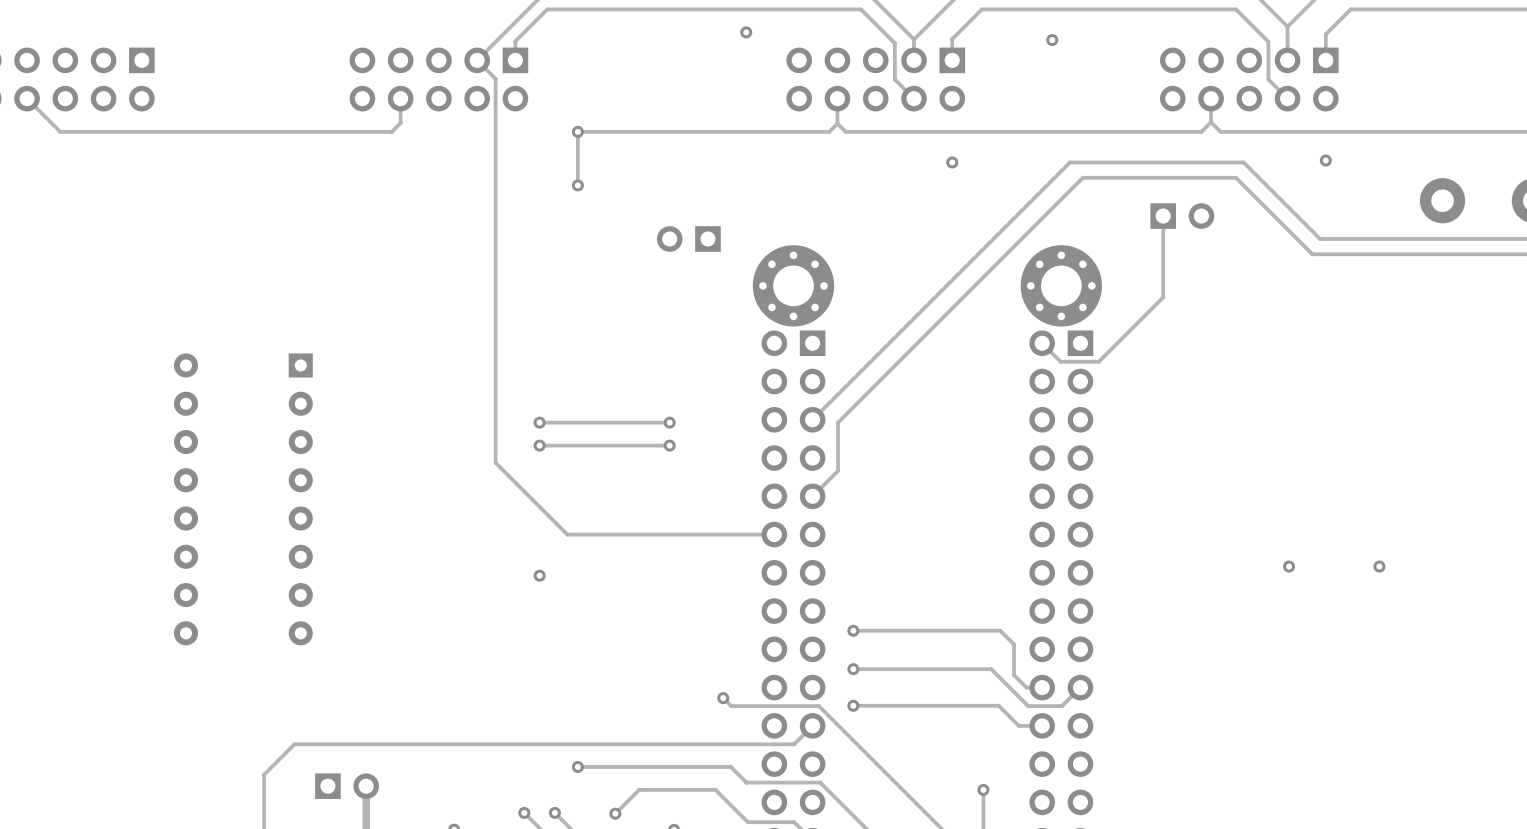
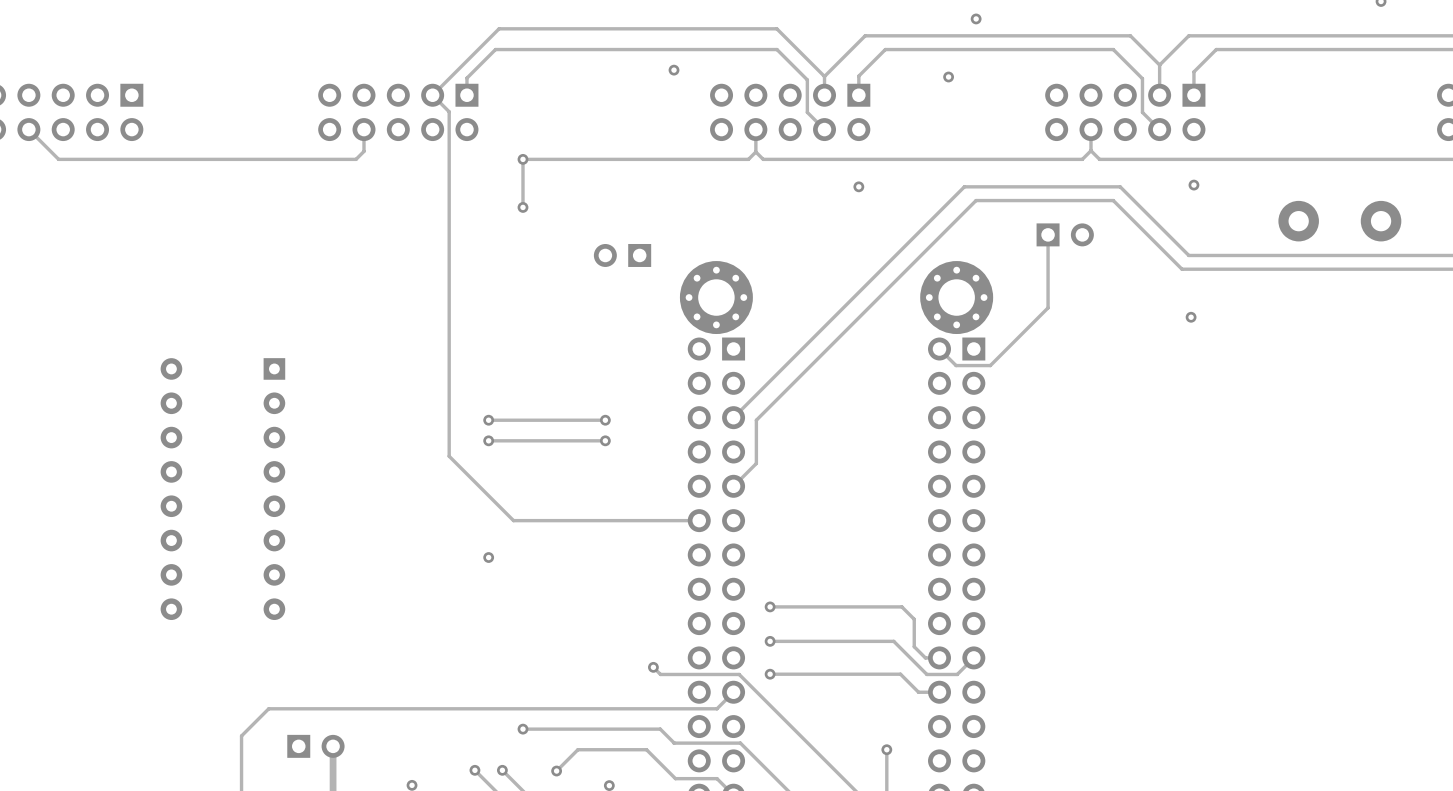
via: none -> (1191, 317)
via: (1289, 566) -> none
via: (1379, 566) -> none

